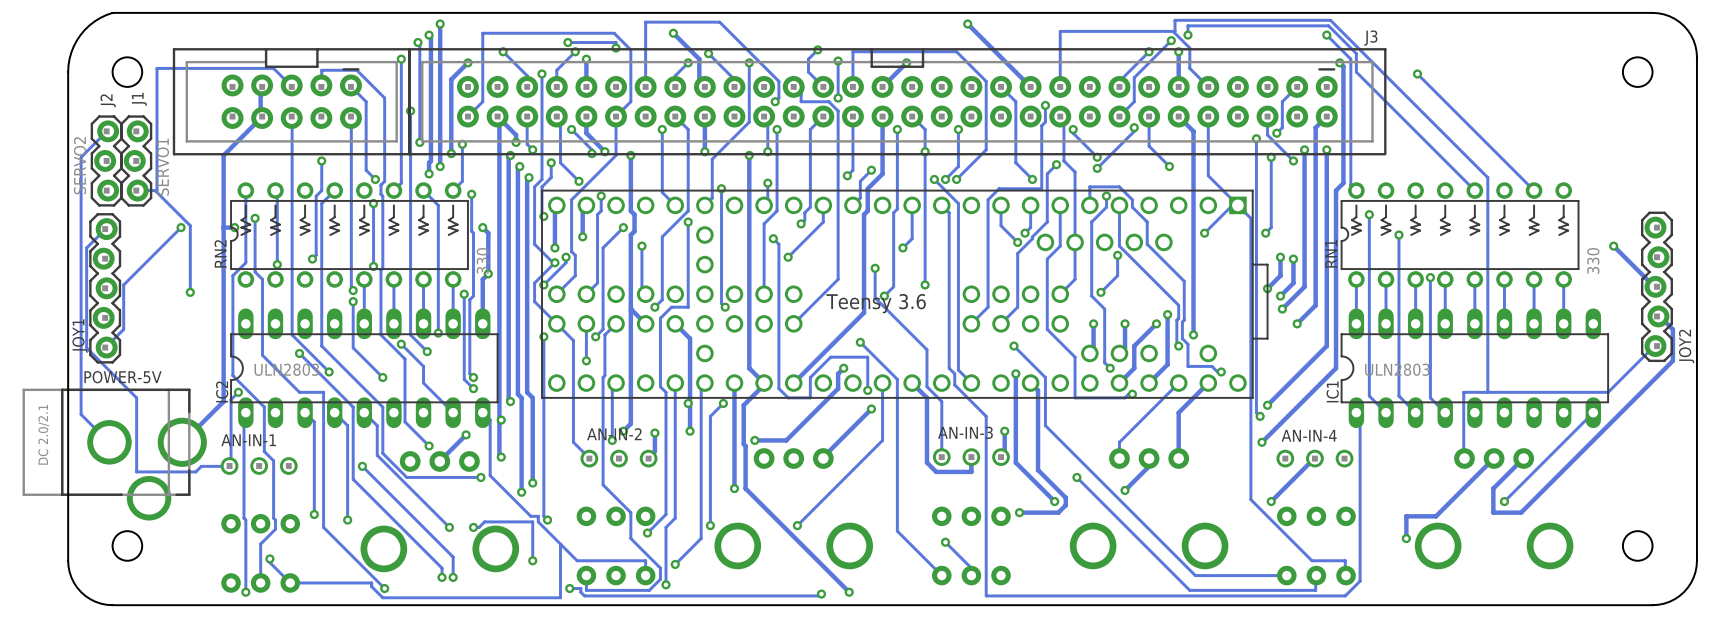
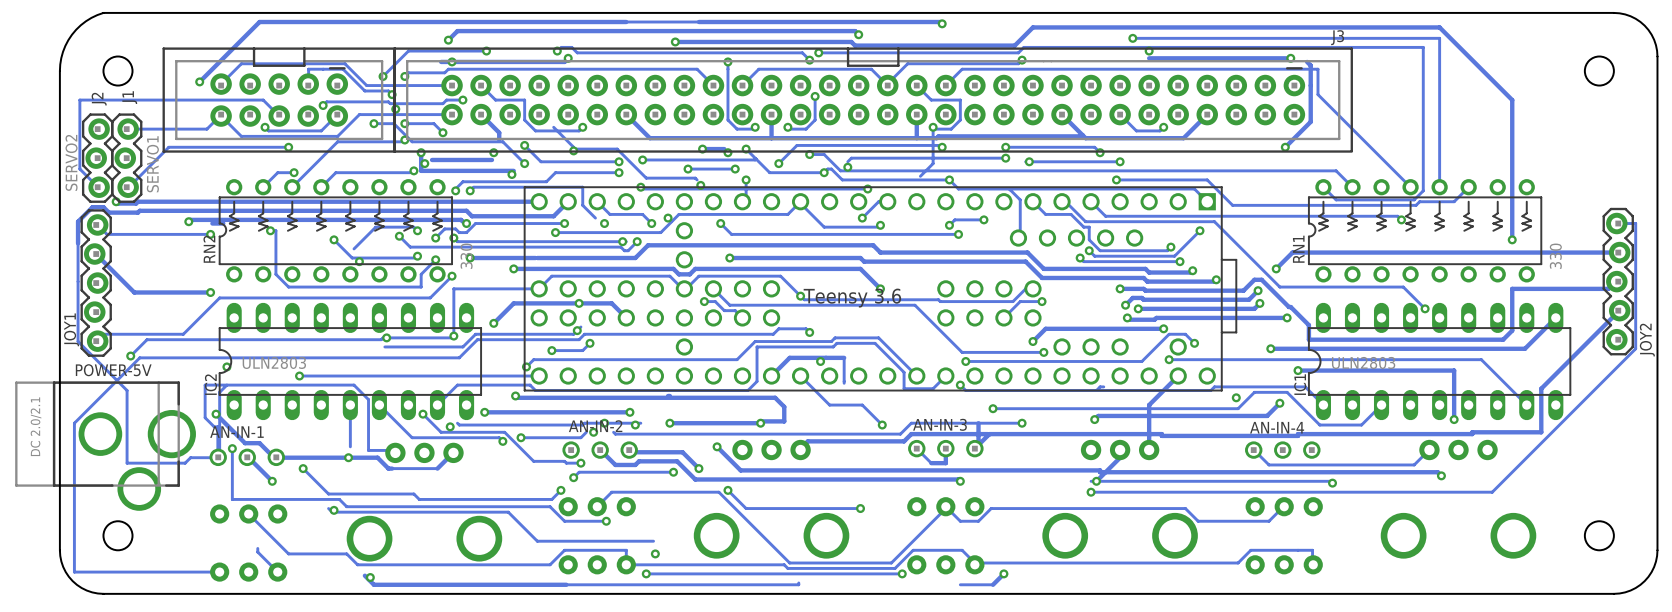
track: (645, 22) (645, 86) -> (626, 22) (259, 22) (199, 81)
track: (719, 22) (778, 81) (778, 98) (775, 101) -> (698, 22) (940, 22) (942, 23)
track: (440, 24) (440, 166) -> none
via: (440, 24) -> none
track: (967, 24) (1030, 86) -> none
track: (1174, 32) (1175, 20) (1330, 20) (1487, 177) (1487, 392) -> none
track: (673, 33) (699, 59) (699, 81) (704, 86) -> none
via: (673, 33) -> none
track: (429, 35) (430, 36) (430, 160) (429, 162) (429, 173) -> none
via: (429, 35) -> none
track: none -> (858, 34) (855, 31) (457, 31) (448, 40)
via: none -> (858, 34)
track: (1187, 35) (1187, 25) (1328, 25) (1356, 53) (1356, 72) (1474, 190) -> (1132, 38) (1439, 38) (1439, 187)
via: (1187, 35) -> none
track: (1326, 35) (1350, 59) (1350, 70) -> (945, 85) (962, 69) (1317, 69)
via: (1326, 35) -> none
via: none -> (1132, 38)
via: none -> (448, 40)
track: (1171, 40) (1134, 77) (1134, 101) (1119, 116) -> none
via: (1171, 40) -> none
track: (417, 42) (419, 44) (419, 142) -> none
via: (417, 42) -> none
track: (567, 42) (616, 42) (616, 48) -> none
via: (567, 42) -> none
track: none -> (675, 41) (851, 41) (855, 45) (1014, 45) (1032, 27) (1439, 27) (1512, 100) (1512, 239)
via: none -> (675, 41)
track: none -> (560, 47) (571, 47) (577, 52) (802, 52) (809, 60)
via: (616, 48) -> none
track: (817, 49) (808, 59) (808, 72) (823, 86) -> none
via: (817, 49) -> none
track: none -> (482, 51) (408, 51) (383, 76)
track: (503, 51) (527, 75) (527, 86) -> none
track: (575, 51) (556, 70) (556, 86) -> none
track: (1149, 51) (1119, 81) (1119, 86) -> none
via: (1149, 51) -> none
track: (1178, 51) (1178, 86) -> none
track: (708, 53) (734, 79) (734, 86) -> (404, 76) (408, 72) (444, 72) (448, 69) (697, 69) (713, 85)
via: (708, 53) -> none
track: none -> (818, 52) (1018, 52) (1023, 47) (1423, 47) (1423, 190) (1414, 199) (1336, 199) (1323, 187)
via: none -> (818, 52)
track: (401, 59) (401, 183) (393, 190) -> none
via: (401, 59) -> none
track: (586, 59) (586, 86) -> (568, 58) (564, 61) (441, 61)
track: none -> (1290, 58) (1149, 58)
via: none -> (1290, 58)
via: none -> (809, 60)
track: (838, 61) (838, 98) -> none
via: (838, 61) -> none
track: none -> (1022, 60) (1018, 63) (907, 63) (887, 85) (871, 69) (758, 69) (742, 85)
via: none -> (1022, 60)
track: (467, 62) (451, 79) (451, 153) -> none
track: (688, 62) (675, 75) (675, 86) -> none
via: (688, 62) -> none
track: (906, 62) (882, 86) -> none
via: (906, 62) -> none
via: (1339, 62) -> none
track: (541, 73) (541, 101) -> (481, 85) (495, 100) (524, 100)
via: (541, 73) -> none
track: (1417, 73) (1534, 190) -> none
via: (1417, 73) -> none
via: none -> (383, 76)
via: none -> (404, 76)
via: none -> (199, 81)
track: none -> (221, 84) (241, 63) (344, 63) (366, 85) (452, 85)
track: (262, 85) (262, 118) (223, 155) (223, 401) (182, 442) -> none
track: (291, 85) (273, 68) (157, 68) (156, 191) -> none
track: (350, 85) (366, 101) (366, 170) (375, 179) -> none
track: (793, 86) (801, 94) (801, 101) (828, 101) (838, 110) -> (815, 96) (815, 109)
track: (852, 86) (852, 51) (956, 51) (986, 81) (986, 101) -> (916, 85) (931, 100) (960, 100)
track: (1001, 86) (1015, 101) (1015, 162) (1032, 179) -> none
track: (1208, 86) (1189, 68) (1189, 48) (1173, 31) (1060, 31) (1060, 86) -> none
track: (1297, 86) (1282, 101) (1282, 127) (1276, 133) -> none
track: (379, 92) (384, 98) (384, 181) (380, 185) (380, 194) (382, 196) (380, 334) (405, 359) (405, 421) (429, 446) -> (364, 90) (388, 90) (392, 94)
via: none -> (392, 94)
track: (1350, 96) (1350, 185) (1356, 190) -> (1317, 94) (1410, 187)
track: none -> (462, 100) (446, 100) (442, 103) (326, 101) (323, 105)
via: none -> (462, 100)
via: (775, 101) -> none
track: (1045, 105) (1045, 122) (1041, 125) (1041, 188) (999, 188) (988, 199) (988, 307) (971, 323) -> none
via: (1045, 105) -> none
via: none -> (323, 105)
track: (410, 110) (410, 334) (427, 351) -> none
track: (467, 116) (482, 101) (482, 33) (614, 33) (630, 49) (630, 101) (616, 116) (616, 155) (571, 199) (571, 251) (575, 255) (575, 275) (569, 281) -> (452, 114) (359, 114) (337, 136) (241, 136) (221, 116) (206, 129) (128, 129)
track: (497, 116) (499, 120) (499, 455) (501, 457) -> none
track: (527, 116) (527, 144) (532, 149) -> none
track: (556, 116) (560, 120) (560, 162) (579, 181) -> none
track: (586, 116) (586, 133) (604, 151) -> none
track: none -> (626, 114) (649, 138) (936, 138) (938, 136) (1082, 135)
track: (675, 116) (688, 129) (688, 210) (662, 236) (662, 299) (654, 307) -> none
track: (704, 116) (704, 151) -> none
track: (764, 116) (767, 120) (767, 151) -> (824, 172) (769, 172) (746, 149)
track: none -> (771, 114) (771, 138)
track: (823, 116) (810, 129) (810, 207) (804, 212) (804, 220) (801, 223) -> none
track: (852, 116) (852, 170) (851, 172) -> none
track: (882, 116) (882, 173) (867, 188) (867, 210) (864, 214) (864, 312) (812, 364) -> none
track: (912, 116) (925, 129) (925, 284) -> none
track: none -> (916, 114) (916, 138)
track: (1060, 116) (1063, 120) (1063, 160) (1075, 172) (1075, 279) (1060, 294) -> (551, 276) (669, 276) (682, 288) (686, 288) (698, 276) (780, 276) (804, 299) (1013, 301) (1025, 288) (1032, 288)
track: (1149, 116) (1149, 146) (1169, 166) -> (1120, 114) (1136, 130) (1160, 130) (1163, 127)
track: (1178, 116) (1193, 131) (1193, 334) -> none
track: (1208, 116) (1208, 175) (1224, 192) -> (1010, 189) (1194, 189)
track: none -> (1207, 114) (1183, 138) (1085, 138) (1062, 114)
track: (1267, 116) (1267, 135) (1293, 160) -> none
track: (1326, 116) (1315, 127) (1315, 305) (1297, 323) -> none
track: (291, 118) (292, 334) (329, 371) -> (279, 116) (263, 100) (79, 100) (79, 169) (99, 187)
track: (350, 118) (351, 288) (353, 290) -> (337, 116) (321, 130) (268, 130) (265, 127)
track: (541, 122) (541, 179) (534, 186) (534, 244) (553, 262) -> (524, 120) (535, 130) (579, 130) (582, 127)
track: (749, 122) (712, 159) (712, 197) (704, 205) -> (727, 120) (737, 129) (753, 129) (755, 127)
track: (838, 122) (838, 279) (793, 323) -> (815, 120) (806, 129) (789, 129) (787, 127)
track: (986, 122) (986, 149) (956, 179) -> (960, 120) (951, 129) (934, 129) (933, 127)
track: (1343, 123) (1343, 183) (1336, 190) (1336, 368) (1262, 442) -> (1310, 121) (1285, 147)
track: none -> (373, 123) (393, 123) (412, 141) (502, 141) (524, 163)
via: none -> (373, 123)
track: none -> (404, 123) (433, 123) (442, 132)
via: none -> (404, 123)
track: (1134, 127) (1134, 131) (1097, 168) -> none
via: (1134, 127) -> none
via: none -> (265, 127)
via: (571, 129) -> none
via: none -> (582, 127)
track: (662, 129) (662, 192) (675, 205) -> none
via: (662, 129) -> none
track: (777, 129) (777, 210) (764, 223) (764, 294) -> none
via: none -> (787, 127)
track: (897, 129) (897, 209) (893, 212) (893, 286) (884, 296) -> none
via: (897, 129) -> none
track: (1073, 129) (1073, 133) (1097, 157) -> none
via: (1073, 129) -> none
via: none -> (1163, 127)
track: (108, 131) (81, 157) (81, 414) (109, 442) -> none
via: (1276, 133) -> none
via: none -> (442, 132)
track: (1256, 138) (1256, 412) (1260, 416) -> none
via: (1256, 138) -> none
via: (516, 142) -> none
track: none -> (401, 141) (337, 141) (292, 187)
track: (462, 144) (462, 181) (453, 190) -> none
via: (462, 144) -> none
track: none -> (524, 145) (540, 161) (619, 161)
via: none -> (524, 145)
via: none -> (288, 147)
via: (532, 149) -> none
track: none -> (942, 147) (940, 145) (796, 145) (778, 163)
via: none -> (942, 147)
track: none -> (1005, 147) (1094, 147) (1100, 152)
via: none -> (1005, 147)
track: (1304, 149) (1304, 286) (1282, 309) -> none
via: (1304, 149) -> none
via: none -> (1285, 147)
track: (1326, 149) (1326, 346) (1267, 405) -> none
via: (1326, 149) -> none
track: none -> (571, 149) (617, 149) (646, 178) (695, 178) (697, 179)
via: (604, 151) -> none
via: (704, 151) -> none
via: none -> (702, 149)
track: none -> (724, 149) (702, 149)
via: (925, 151) -> none
via: (451, 153) -> none
track: none -> (421, 152) (421, 170) (513, 170)
via: none -> (421, 152)
track: (510, 155) (508, 157) (508, 399) (510, 401) -> none
track: (630, 155) (630, 210) (634, 214) (634, 231) (630, 235) (630, 309) -> (493, 323) (513, 303) (611, 303)
via: (630, 155) -> none
track: (749, 155) (749, 368) (764, 384) (743, 405) (745, 488) (849, 592) -> none
via: none -> (1100, 152)
track: none -> (809, 154) (824, 154) (840, 170) (1336, 170) (1352, 187)
via: none -> (809, 154)
via: (1097, 157) -> none
track: (1271, 157) (1271, 227) (1265, 233) -> none
via: (1271, 157) -> none
track: (321, 160) (321, 190) (316, 196) (316, 255) (312, 259) -> none
via: (321, 160) -> none
track: none -> (1005, 158) (851, 158) (847, 161)
via: none -> (1005, 158)
via: (1293, 160) -> none
track: none -> (756, 159) (642, 159)
track: none -> (491, 159) (432, 159)
track: (551, 162) (551, 177) (541, 186) (541, 214) (543, 216) -> none
via: (551, 162) -> none
via: none -> (642, 159)
via: none -> (619, 161)
track: (1056, 164) (1047, 173) (1047, 203) -> (827, 169) (831, 169) (842, 179) (949, 179) (958, 189) (1009, 189) (1020, 199)
track: none -> (1120, 161) (1025, 161)
via: none -> (1120, 161)
track: (519, 166) (517, 168) (517, 394) (521, 397) (521, 492) -> none
via: (519, 166) -> none
via: none -> (524, 163)
via: none -> (778, 163)
via: (1169, 166) -> none
via: (1097, 168) -> none
track: (871, 170) (860, 181) (860, 197) (852, 205) -> none
via: none -> (688, 169)
track: none -> (735, 169) (688, 169)
via: none -> (735, 169)
via: none -> (294, 172)
track: none -> (410, 172) (335, 172) (321, 187)
track: none -> (619, 172) (555, 172) (546, 181) (462, 181) (453, 190)
via: none -> (619, 172)
track: (529, 177) (527, 179) (527, 392) (532, 397) (532, 483) -> none
via: (375, 179) -> none
track: (934, 179) (958, 203) (958, 370) (971, 383) -> (757, 346) (833, 346) (836, 343) (875, 343) (904, 372) (904, 388) (933, 388) (945, 376)
via: (934, 179) -> none
via: (945, 179) -> none
via: (956, 179) -> none
via: (1032, 179) -> none
via: (579, 181) -> none
via: none -> (949, 179)
track: none -> (1116, 179) (1207, 179) (1232, 205) (1416, 205) (1419, 201) (1454, 201) (1468, 187)
via: none -> (1116, 179)
track: (721, 188) (721, 303) (725, 307) -> (742, 317) (735, 310) (724, 310) (715, 301) (704, 301)
track: (138, 190) (155, 190) (190, 225) (190, 292) -> (128, 187) (168, 147) (288, 147)
track: (245, 190) (245, 262) (232, 275) (232, 375) (264, 407) (264, 451) (273, 460) (273, 518) (275, 520) (275, 529) (260, 544) (260, 582) -> none
track: (275, 190) (277, 192) (277, 264) -> (263, 187) (277, 172) (294, 172)
track: (334, 190) (321, 203) (321, 346) (368, 392) -> (310, 385) (354, 385)
track: (423, 190) (438, 205) (438, 333) -> none
track: none -> (640, 187) (642, 189) (867, 189)
via: none -> (640, 187)
via: none -> (867, 189)
track: (471, 194) (473, 296) (469, 299) -> (539, 288) (453, 288) (453, 294)
track: none -> (470, 190) (473, 187) (582, 187) (582, 192)
via: none -> (470, 190)
via: (601, 196) -> none
track: (1106, 196) (1106, 207) (1091, 222) (1091, 296) (1104, 309) (1104, 362) (1110, 368) -> none
via: (1106, 196) -> none
track: (373, 203) (373, 266) -> none
via: (373, 203) -> none
via: none -> (116, 201)
track: (556, 205) (554, 207) (554, 247) -> (539, 201) (137, 201) (136, 203) (117, 203) (116, 201)
track: none -> (597, 201) (609, 214) (642, 214) (651, 223)
track: none -> (800, 201) (787, 214) (678, 214) (660, 232) (555, 232)
track: (912, 205) (912, 238) (902, 247) -> (887, 201) (878, 201) (862, 218)
track: (941, 205) (949, 212) (949, 368) (954, 373) (954, 384) (986, 416) (986, 595) -> none
track: (1001, 205) (1001, 225) (1017, 242) -> none
track: (1030, 205) (1030, 227) (1025, 233) -> none
track: (1060, 205) (1060, 246) (1047, 259) (1047, 329) (1075, 357) (1075, 397) -> (960, 385) (965, 390) (1047, 390)
track: (1089, 205) (1089, 186) (1119, 186) (1132, 199) (1132, 207) (1147, 222) (1147, 244) (1184, 281) (1182, 338) (1187, 344) (1187, 366) (1199, 366) -> (1062, 201) (1065, 201) (1085, 221) (1214, 221) (1279, 287) (1403, 287) (1425, 308)
track: (1119, 205) (1119, 246) -> (1032, 201) (1045, 214) (1071, 214) (1083, 227) (1089, 227) (1089, 239) (1091, 241)
track: none -> (1091, 201) (1105, 216) (1397, 216) (1401, 219)
track: (823, 207) (823, 222) (788, 257) -> (800, 203) (824, 227) (878, 227) (880, 225)
track: (582, 209) (582, 236) -> (564, 205) (553, 216) (472, 216) (466, 210) (139, 210) (137, 212) (108, 212) (103, 207) (92, 207) (78, 221) (78, 243)
track: (601, 209) (597, 214) (597, 283) (586, 294) -> (582, 205) (595, 218)
track: (1369, 214) (1369, 396) (1386, 412) -> none
via: (1369, 214) -> none
via: (543, 216) -> none
track: (255, 218) (255, 272) (262, 279) (262, 355) (299, 392) -> (218, 457) (217, 426) (214, 426) (205, 417) (205, 385) (286, 385)
via: (255, 218) -> none
track: (688, 222) (688, 307) (671, 307) (660, 318) (660, 386) (666, 392) (666, 514) (647, 533) -> none
via: none -> (862, 218)
track: (1047, 222) (1017, 253) (1017, 307) (1001, 323) -> (1020, 218) (1020, 238) (1018, 238)
via: (801, 223) -> none
track: none -> (983, 219) (954, 219) (949, 225)
via: none -> (983, 219)
via: none -> (1401, 219)
via: none -> (188, 221)
track: none -> (462, 221) (461, 219) (190, 219) (188, 221)
track: (181, 227) (123, 284) (123, 329) (112, 340) -> (452, 276) (430, 297) (219, 297) (183, 334) (103, 334)
via: (181, 227) -> none
via position: (234, 227) -> (210, 234)
track: (482, 227) (488, 233) (488, 273) (482, 279) (482, 323) -> none
track: none -> (564, 223) (475, 223) (466, 232) (459, 232) (455, 228) (444, 228) (435, 238)
via: none -> (564, 223)
track: (623, 227) (603, 247) (603, 329) (599, 333) -> none
via: none -> (651, 223)
track: none -> (720, 223) (731, 234) (958, 234)
via: none -> (720, 223)
track: none -> (1616, 223) (1635, 223) (1635, 348) (1492, 492) (1091, 492)
track: (106, 229) (86, 247) -> (97, 224) (107, 234) (210, 234)
via: none -> (880, 225)
via: none -> (949, 225)
via: (1025, 233) -> none
track: (1204, 233) (1234, 203) (1250, 218) (1250, 499) (1311, 560) -> (626, 564) (784, 564) (787, 568) (895, 568) (913, 550) (962, 550) (974, 564) (976, 563) (1238, 563) (1250, 550) (1279, 550)
via: (1204, 233) -> none
via: (1265, 233) -> none
track: none -> (270, 230) (275, 230) (275, 274) (288, 287) (421, 287) (421, 274) (435, 259)
via: none -> (270, 230)
track: none -> (417, 230) (413, 227) (375, 227) (354, 248)
via: none -> (417, 230)
track: none -> (1199, 230) (1174, 256) (1094, 256) (1091, 252)
via: none -> (1199, 230)
track: (1398, 235) (1398, 396) (1415, 412) -> (993, 408) (1238, 408) (1254, 392) (1287, 392) (1319, 425) (1361, 425) (1381, 405)
via: (1398, 235) -> none
via: none -> (555, 232)
via: (582, 236) -> none
track: (773, 238) (778, 244) (778, 353) -> none
via: (773, 238) -> none
via: none -> (958, 234)
track: none -> (399, 236) (410, 247) (620, 247) (624, 250) (628, 250) (637, 241)
via: none -> (399, 236)
via: none -> (435, 238)
track: none -> (453, 238) (457, 241) (626, 241)
via: none -> (453, 238)
via: (1017, 242) -> none
track: none -> (334, 239) (352, 258) (415, 258) (417, 256)
via: none -> (334, 239)
via: none -> (1512, 239)
track: (641, 246) (641, 290) (645, 294) -> none
via: none -> (637, 241)
track: (1613, 246) (1654, 286) -> (1120, 288) (1243, 290) (1254, 279) (1261, 279) (1308, 325) (1308, 339) (1503, 339) (1512, 330) (1512, 288) (1608, 288) (1615, 281)
via: (1613, 246) -> none
via: (554, 247) -> none
via: (902, 247) -> none
via: none -> (1170, 247)
track: (1117, 255) (1117, 275) (1100, 292) -> none
track: (1128, 255) (1178, 305) (1178, 318) (1176, 320) (1176, 344) (1178, 346) -> (1100, 250) (1167, 250) (1170, 247)
track: (566, 257) (566, 262) (543, 284) -> none
via: (566, 257) -> none
via: (788, 257) -> none
track: (1280, 257) (1280, 275) (1267, 288) -> none
via: (1280, 257) -> none
track: none -> (1619, 252) (1292, 252) (1276, 268)
track: none -> (94, 254) (134, 292) (210, 292)
via: (312, 259) -> none
track: (1293, 259) (1293, 283) (1280, 296) -> none
via: (1293, 259) -> none
via: none -> (417, 256)
via: none -> (470, 258)
track: none -> (535, 258) (470, 258)
track: (554, 262) (534, 283) (534, 301) (573, 340) (573, 442) (589, 458) -> (537, 258) (635, 258) (648, 245) (873, 245) (880, 252) (1027, 252) (1043, 268) (1145, 268) (1149, 272) (1190, 272) (1192, 270)
via: (554, 262) -> none
track: none -> (729, 258) (860, 258) (864, 261) (1025, 261) (1042, 277) (1143, 277) (1147, 281) (1214, 281) (1216, 279)
via: none -> (729, 258)
track: none -> (1080, 258) (1083, 261) (1180, 261)
via: none -> (1080, 258)
via: (277, 264) -> none
via: none -> (435, 259)
via: none -> (1180, 261)
track: (875, 268) (875, 297) (926, 349) (926, 386) (941, 401) (941, 457) -> none
via: (875, 268) -> none
via: (488, 273) -> none
track: none -> (513, 268) (673, 268) (678, 274) (689, 274) (695, 268) (860, 268) (880, 288)
via: none -> (513, 268)
via: none -> (1276, 268)
via: none -> (1192, 270)
track: (1430, 277) (1430, 397) (1445, 412) -> none
via: (1430, 277) -> none
track: (364, 279) (364, 323) -> none
track: (393, 279) (393, 323) -> none
track: (423, 279) (423, 323) -> none
track: (453, 279) (453, 323) -> none
track: (1356, 279) (1356, 323) -> none
track: (1386, 279) (1386, 323) -> none
track: (1415, 279) (1415, 323) -> none
track: (1445, 279) (1445, 323) -> none
track: (1474, 279) (1474, 323) -> none
track: (1504, 279) (1504, 323) -> none
track: (1534, 279) (1534, 323) -> none
track: (1563, 279) (1563, 323) -> none
via: none -> (452, 276)
via: (543, 284) -> none
via: (925, 284) -> none
via: none -> (1216, 279)
via: (1267, 288) -> none
via: (353, 290) -> none
via: (190, 292) -> none
via: (1100, 292) -> none
track: (464, 294) (464, 379) (473, 388) -> none
via: (464, 294) -> none
track: none -> (713, 288) (729, 305) (914, 305) (962, 352) (1043, 352)
via: none -> (880, 288)
via: none -> (1120, 288)
via: (884, 296) -> none
via: (1280, 296) -> none
track: none -> (1258, 290) (1249, 299) (1143, 299) (1132, 297) (1125, 305)
via: none -> (1258, 290)
via: none -> (210, 292)
track: (353, 301) (353, 347) (382, 377) -> none
via: (353, 301) -> none
via: none -> (800, 296)
via: (654, 307) -> none
track: none -> (1042, 301) (1020, 301) (1003, 317)
via: none -> (1042, 301)
via: none -> (579, 303)
track: (631, 309) (630, 423) (623, 431) -> none
via: (1282, 309) -> none
via: none -> (1259, 303)
via: none -> (1125, 305)
track: (1167, 314) (1167, 364) (1149, 383) -> (1138, 308) (1254, 308) (1259, 303)
via: none -> (1425, 308)
track: (1658, 316) (1672, 329) (1672, 360) (1521, 512) (1493, 512) (1493, 488) (1523, 458) -> (1619, 310) (1541, 388) (1541, 432) (1298, 434) (1298, 435) (989, 434) (978, 445)
track: (586, 323) (586, 360) -> none
track: (616, 323) (604, 334) (603, 484) (630, 512) (630, 538) (660, 568) (660, 579) (649, 590) (586, 590) (586, 575) -> none
track: (675, 323) (690, 338) (690, 431) -> none
track: (1093, 323) (1093, 349) (1089, 353) -> none
via: (1093, 323) -> none
track: (1125, 323) (1125, 347) (1119, 353) -> none
via: (1125, 323) -> none
track: (1156, 323) (1134, 346) (1134, 368) (1119, 383) -> (1127, 317) (1129, 319) (1154, 319) (1156, 317) (1287, 317)
via: (1297, 323) -> none
via: none -> (1287, 317)
track: none -> (1555, 317) (1524, 348) (1270, 348)
via: none -> (493, 323)
via: (438, 333) -> none
track: none -> (1160, 328) (1045, 328) (1032, 341)
track: (543, 336) (543, 516) (547, 520) -> none
via: (543, 336) -> none
track: none -> (577, 330) (573, 334) (475, 334) (462, 346) (384, 346)
track: none -> (809, 332) (806, 328) (778, 328) (773, 334) (584, 334) (579, 339) (477, 339) (459, 357) (139, 357) (74, 423) (74, 572) (219, 572)
via: none -> (809, 332)
track: (469, 342) (469, 373) (473, 377) -> (453, 336) (452, 337) (383, 337) (381, 339) (147, 339) (130, 356)
via: none -> (453, 336)
track: (860, 342) (897, 379) (897, 531) (941, 575) -> none
via: (860, 342) -> none
track: (401, 344) (423, 366) (423, 383) (453, 412) -> (757, 381) (747, 390) (535, 390) (530, 385) (457, 385) (437, 405)
track: (1013, 346) (1045, 377) (1045, 425) (1195, 575) (1286, 575) -> none
via: (1013, 346) -> none
via: (1178, 346) -> none
track: (1655, 346) (1608, 392) (1463, 392) (1464, 458) -> (1253, 450) (1268, 464) (1414, 464) (1429, 450)
via: none -> (1032, 341)
track: none -> (590, 343) (582, 350) (551, 350)
via: none -> (590, 343)
track: none -> (1194, 343) (1185, 334) (1169, 334) (1141, 361) (965, 361)
via: none -> (1194, 343)
via: (427, 351) -> none
track: (299, 353) (353, 407) (353, 479) (442, 568) (442, 577) -> none
via: (299, 353) -> none
via: none -> (1270, 348)
via: none -> (551, 350)
via: none -> (1043, 352)
via: (586, 360) -> none
via: none -> (130, 356)
track: (867, 364) (867, 357) (830, 357) (810, 377) (810, 397) (788, 397) (778, 388) -> (844, 357) (789, 357)
via: none -> (1169, 359)
track: (1212, 366) (1217, 371) (1221, 371) -> (1181, 359) (1481, 359) (1526, 405)
track: (843, 368) (838, 373) (838, 388) (786, 440) (754, 440) -> none
via: none -> (965, 361)
via: (1110, 368) -> none
via: (329, 371) -> none
via: (1221, 371) -> none
via: none -> (226, 366)
track: none -> (526, 366) (533, 359) (737, 359) (755, 341) (831, 341) (835, 337) (878, 337) (916, 376)
via: none -> (526, 366)
track: (1015, 373) (1015, 462) (1054, 501) -> none
via: (1015, 373) -> none
via: (382, 377) -> none
via: (473, 377) -> none
track: none -> (1298, 370) (1454, 370) (1454, 419)
via: none -> (1298, 370)
via: none -> (299, 376)
track: none -> (539, 376) (299, 376)
track: (616, 383) (612, 386) (612, 440) -> none
track: (675, 383) (675, 518) (666, 527) (666, 584) -> none
track: (704, 383) (701, 386) (701, 538) (675, 564) -> none
track: (734, 383) (734, 488) -> none
track: none -> (800, 376) (829, 405) (862, 405) (882, 425)
track: (882, 383) (882, 440) (797, 525) -> none
track: (912, 383) (926, 397) (926, 462) (936, 471) (956, 471) -> (916, 448) (931, 463)
track: (1030, 383) (1038, 390) (1038, 470) (1065, 497) (1065, 505) (1058, 512) (1019, 512) -> none
track: (1178, 383) (1119, 442) (1119, 458) -> none
via: (473, 388) -> none
via: (867, 390) -> none
via: (238, 392) -> none
track: (323, 392) (323, 527) (360, 564) -> (248, 513) (288, 553) (346, 553)
via: none -> (960, 385)
via: (1132, 394) -> none
via: (510, 401) -> none
track: none -> (515, 395) (517, 397) (775, 397) (784, 406) (784, 421) (760, 421) (760, 423) (671, 423) (669, 421)
via: none -> (515, 395)
via: (688, 403) -> none
track: (723, 403) (710, 416) (710, 525) -> none
via: (723, 403) -> none
track: (871, 408) (830, 449) -> (988, 435) (911, 434) (904, 441) (807, 441)
via: (871, 408) -> none
track: none -> (1279, 403) (1267, 415) (1098, 415) (1094, 419)
via: none -> (1279, 403)
track: (245, 412) (243, 414) (243, 457) -> none
track: (305, 412) (314, 421) (314, 514) -> none
track: (334, 412) (347, 425) (347, 520) -> none
track: (364, 412) (377, 425) (377, 455) (449, 527) -> (350, 405) (350, 446)
track: none -> (379, 405) (412, 437) (499, 437) (502, 441)
track: (482, 412) (490, 420) (490, 475) (530, 516) -> (232, 499) (339, 499) (346, 506) (513, 506)
track: (1356, 412) (1360, 416) (1360, 581) (1345, 595) (1019, 595) -> (1323, 405) (1305, 386) (1214, 386) (1210, 390) (1096, 390)
track: (1593, 412) (1504, 501) -> none
via: (1260, 416) -> none
track: none -> (629, 412) (484, 412)
via: none -> (629, 412)
track: none -> (216, 414) (245, 443) (259, 443) (274, 457) (377, 457) (388, 468) (392, 468)
via: none -> (216, 414)
track: none -> (422, 414) (441, 432) (504, 432) (533, 461) (580, 463)
via: none -> (422, 414)
via: none -> (1094, 419)
via: none -> (1454, 419)
track: none -> (640, 423) (584, 423) (582, 425) (459, 425) (457, 423)
via: none -> (760, 423)
via position: (1004, 431) -> (993, 408)
track: none -> (1022, 423) (911, 423) (900, 434) (615, 434) (613, 432)
via: none -> (1022, 423)
track: (654, 433) (654, 451) (648, 458) -> (698, 468) (682, 452) (631, 452) (629, 450)
via: none -> (882, 425)
track: (466, 434) (439, 461) -> none
track: none -> (586, 432) (580, 437) (521, 437)
via: (754, 440) -> none
via: (1262, 442) -> none
via: (429, 446) -> none
via: none -> (521, 437)
via: none -> (502, 441)
track: (382, 453) (406, 477) -> (368, 445) (368, 450) (392, 450) (395, 452)
track: none -> (717, 446) (740, 470) (1437, 472) (1441, 475)
via: none -> (717, 446)
via: none -> (232, 448)
via: (501, 457) -> none
track: none -> (600, 450) (615, 464) (635, 464) (639, 461) (677, 461) (695, 479) (958, 479) (960, 481)
track: (1314, 458) (1271, 501) -> none
track: (1494, 458) (1435, 516) (1406, 516) (1406, 538) -> none
track: none -> (247, 457) (272, 481)
track: (362, 466) (453, 557) (453, 577) -> none
via: none -> (580, 463)
track: none -> (303, 468) (328, 494) (413, 494) (419, 499) (551, 499) (560, 490)
via: none -> (303, 468)
track: (480, 477) (453, 477) -> (453, 452) (437, 468)
via: (480, 477) -> none
via: none -> (698, 468)
track: (1076, 477) (1189, 590) (1315, 590) (1316, 575) -> none
via: (1076, 477) -> none
track: none -> (673, 472) (579, 472) (573, 477)
via: none -> (673, 472)
via: (532, 483) -> none
via: none -> (573, 477)
via: (734, 488) -> none
via: none -> (272, 481)
via: none -> (960, 481)
track: none -> (1091, 481) (1330, 481) (1332, 483)
via: (521, 492) -> none
via: none -> (1332, 483)
via: none -> (560, 490)
track: none -> (727, 490) (746, 508) (860, 508)
via: none -> (727, 490)
via: (1054, 501) -> none
via: none -> (1091, 492)
via: (1271, 501) -> none
via position: (1504, 501) -> (1441, 475)
track: (243, 508) (243, 518) (245, 520) (245, 592) -> none
via: (1019, 512) -> none
via: (314, 514) -> none
track: (538, 516) (538, 521) (577, 560) (582, 560) -> (521, 506) (550, 506) (564, 521) (606, 521)
track: none -> (1284, 506) (1268, 521) (1198, 521) (1185, 508) (991, 508) (978, 521) (960, 521) (945, 506) (891, 563) (789, 563) (718, 492) (611, 492) (597, 506)
via: none -> (860, 508)
via: (547, 520) -> none
track: (484, 521) (479, 527) (473, 527) -> (468, 512) (332, 512) (328, 508)
track: (525, 521) (532, 521) (532, 560) -> (508, 512) (537, 541) (653, 541)
via: (710, 525) -> none
via: (797, 525) -> none
via: (449, 527) -> none
via: (473, 527) -> none
via position: (647, 533) -> (606, 521)
via: (1406, 538) -> none
track: (945, 542) (971, 568) (971, 575) -> none
via: (945, 542) -> none
track: (561, 545) (560, 597) (382, 597) (371, 586) (371, 582) (290, 582) -> none
via: (269, 558) -> none
via: (532, 560) -> none
track: (371, 575) (384, 588) -> (357, 564) (550, 564) (564, 550)
via: (442, 577) -> none
via: (453, 577) -> none
track: none -> (902, 573) (644, 573)
via: none -> (902, 573)
track: none -> (1003, 573) (993, 584)
via: none -> (1003, 573)
track: (569, 588) (580, 588) (580, 592) (584, 595) -> (364, 575) (373, 584) (566, 584)
via: (569, 588) -> none
via: (245, 592) -> none
via: (849, 592) -> none
via: (821, 594) -> none

